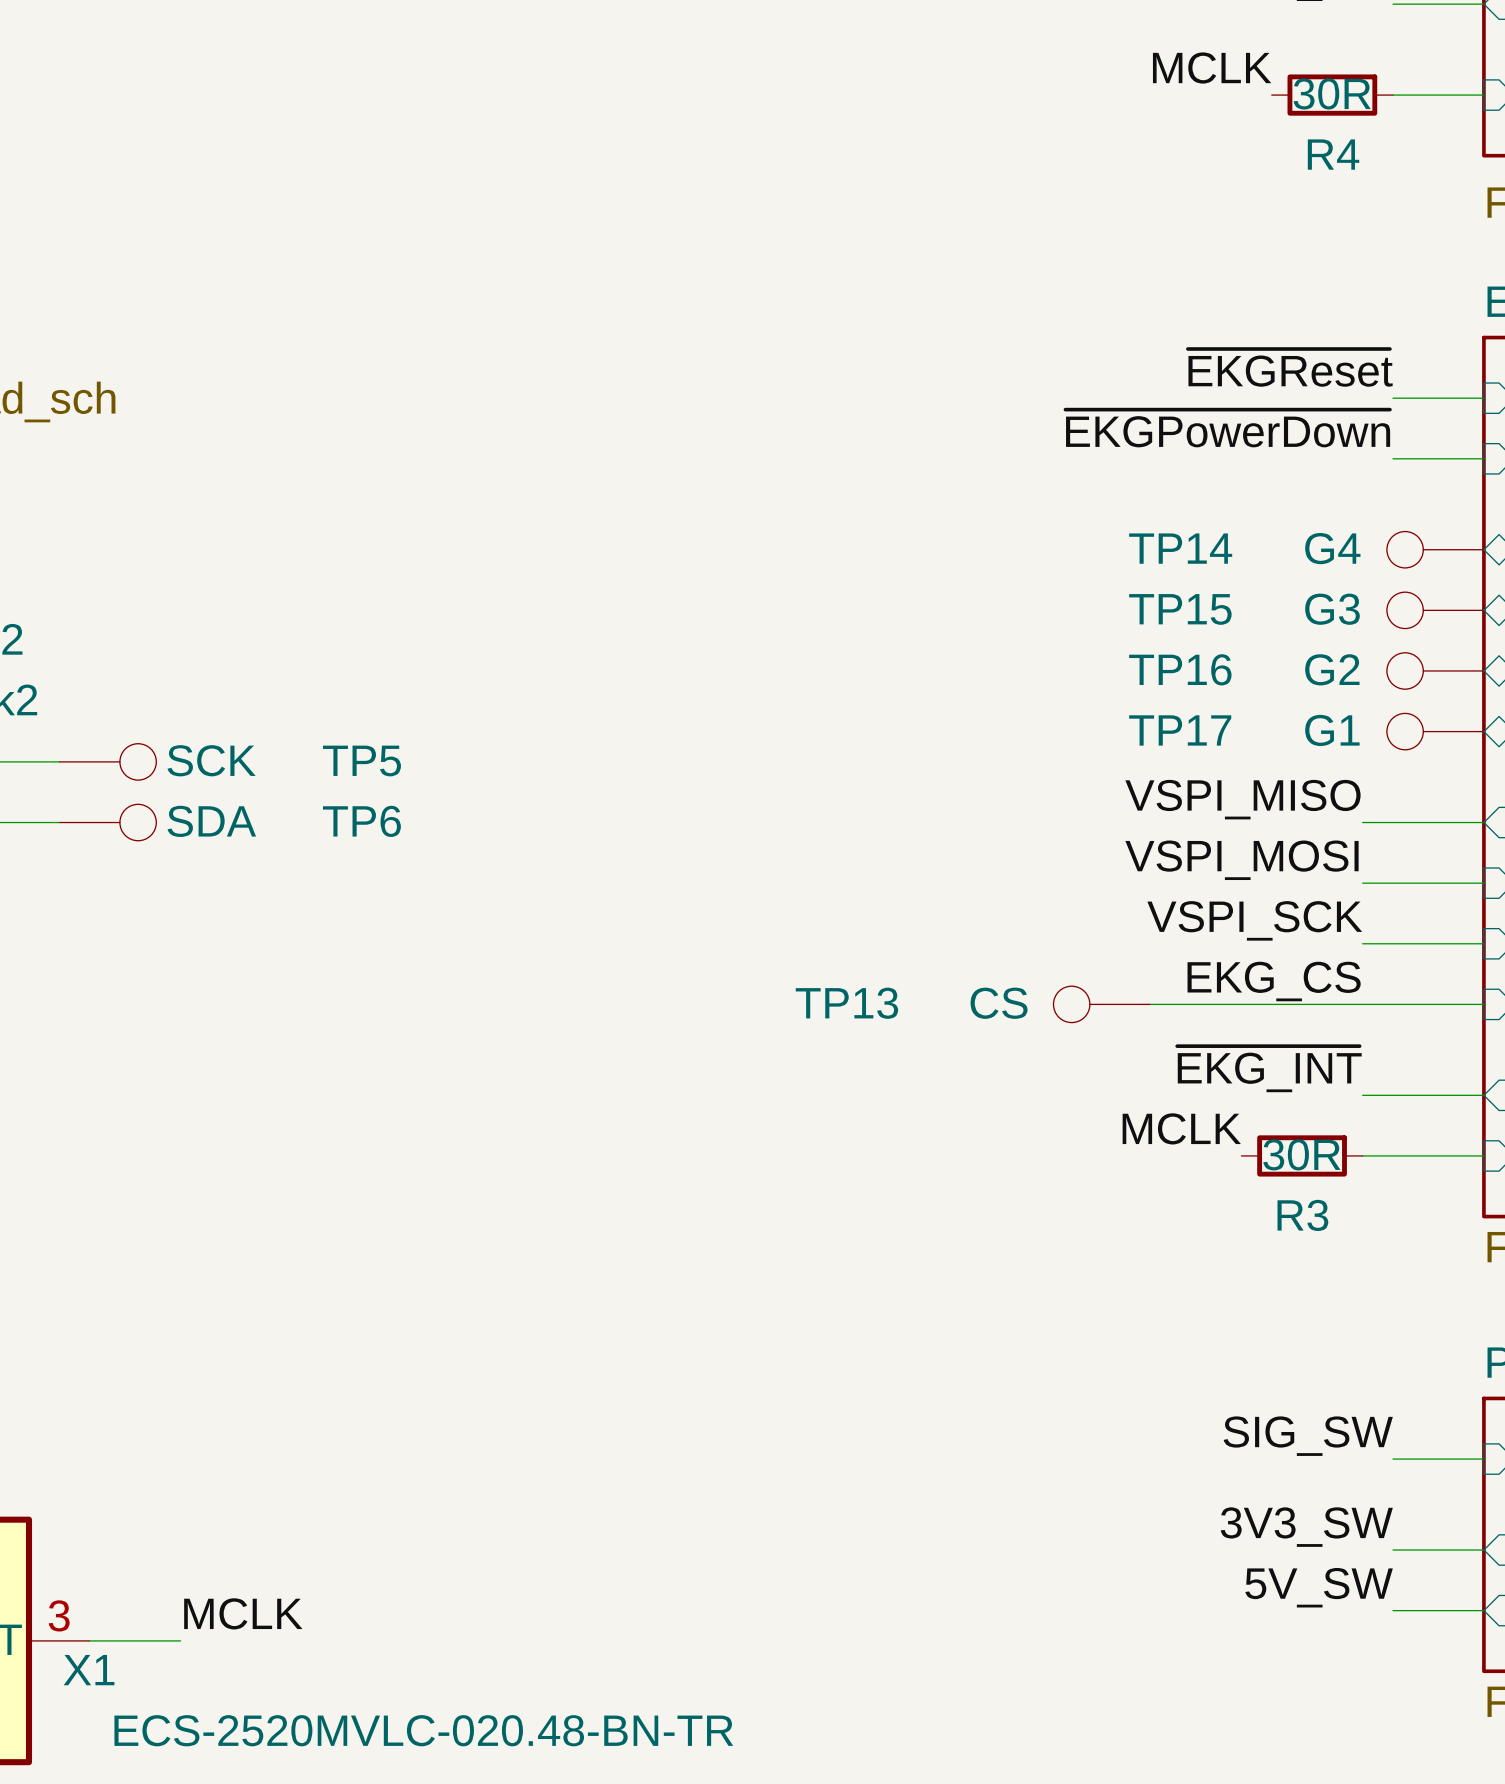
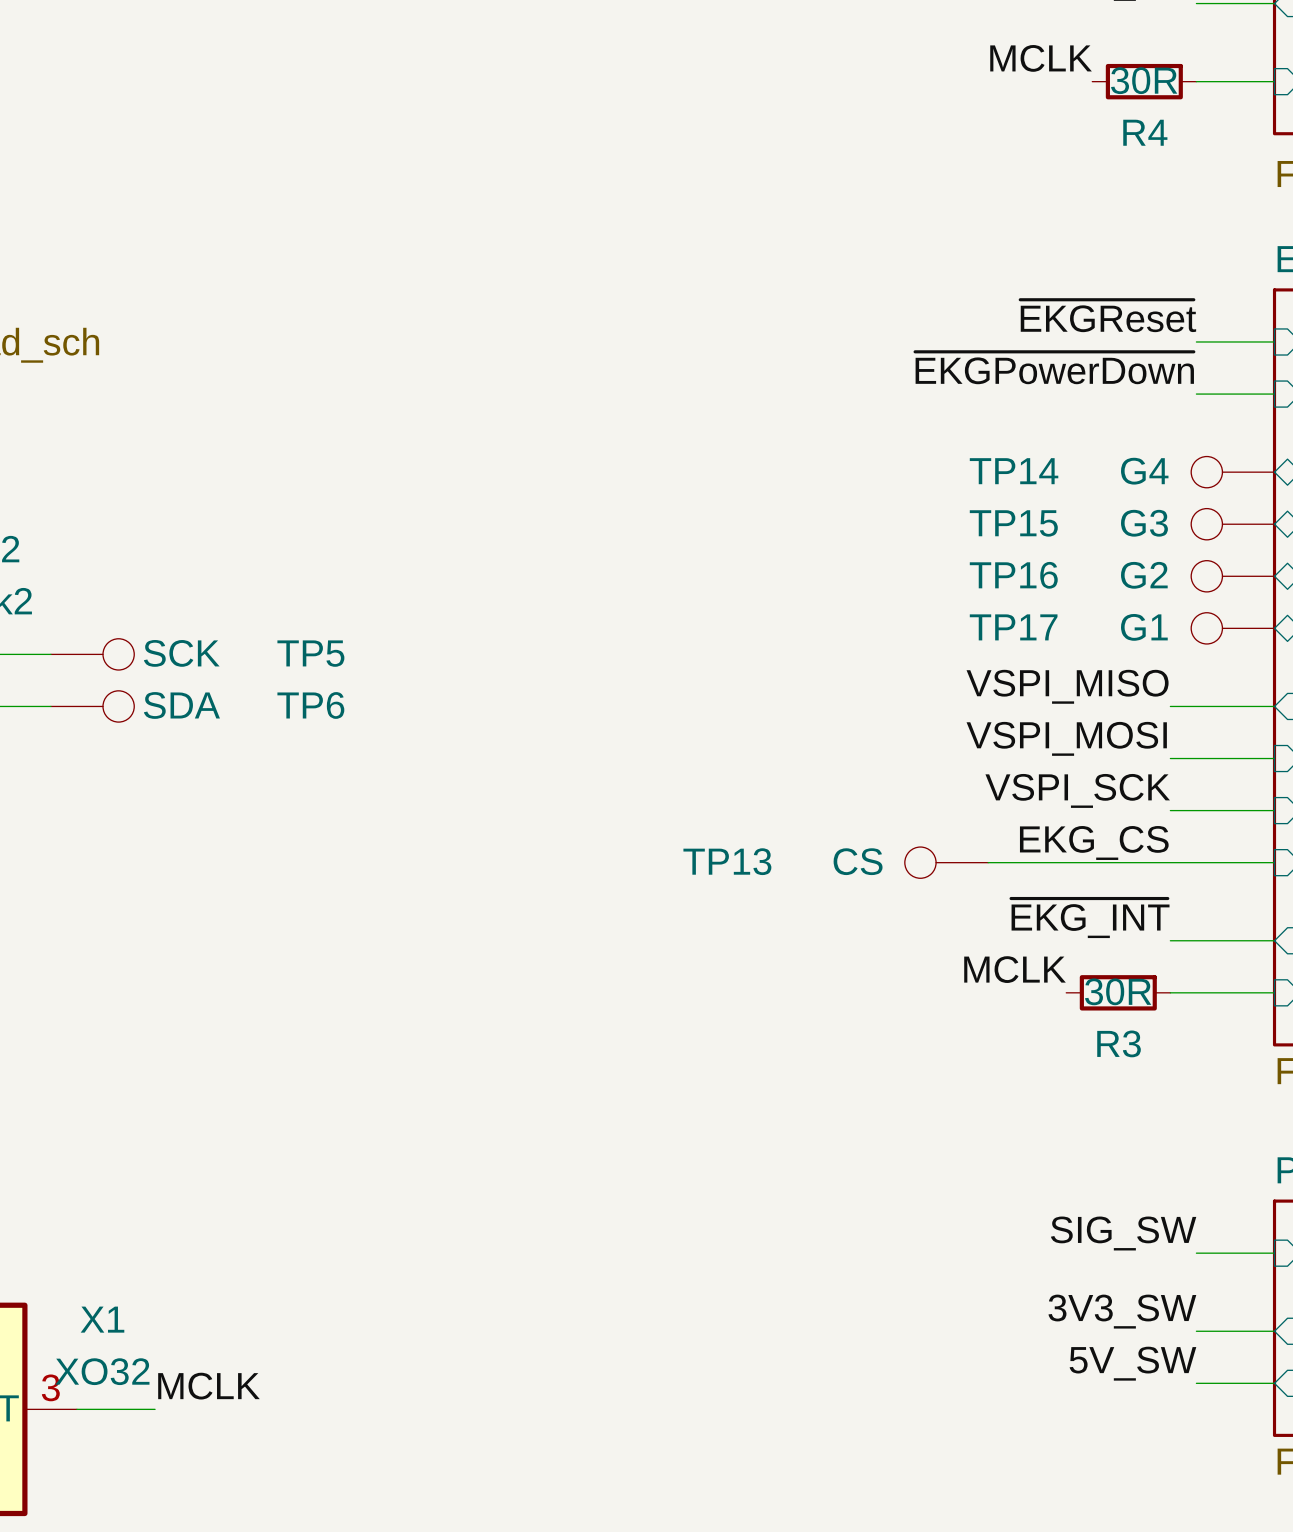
X1 name position: X1 (89, 1670) -> X1 (102, 1319)
X1 value: ECS-2520MVLC-020.48-BN-TR (423, 1730) -> XO32 (102, 1371)

